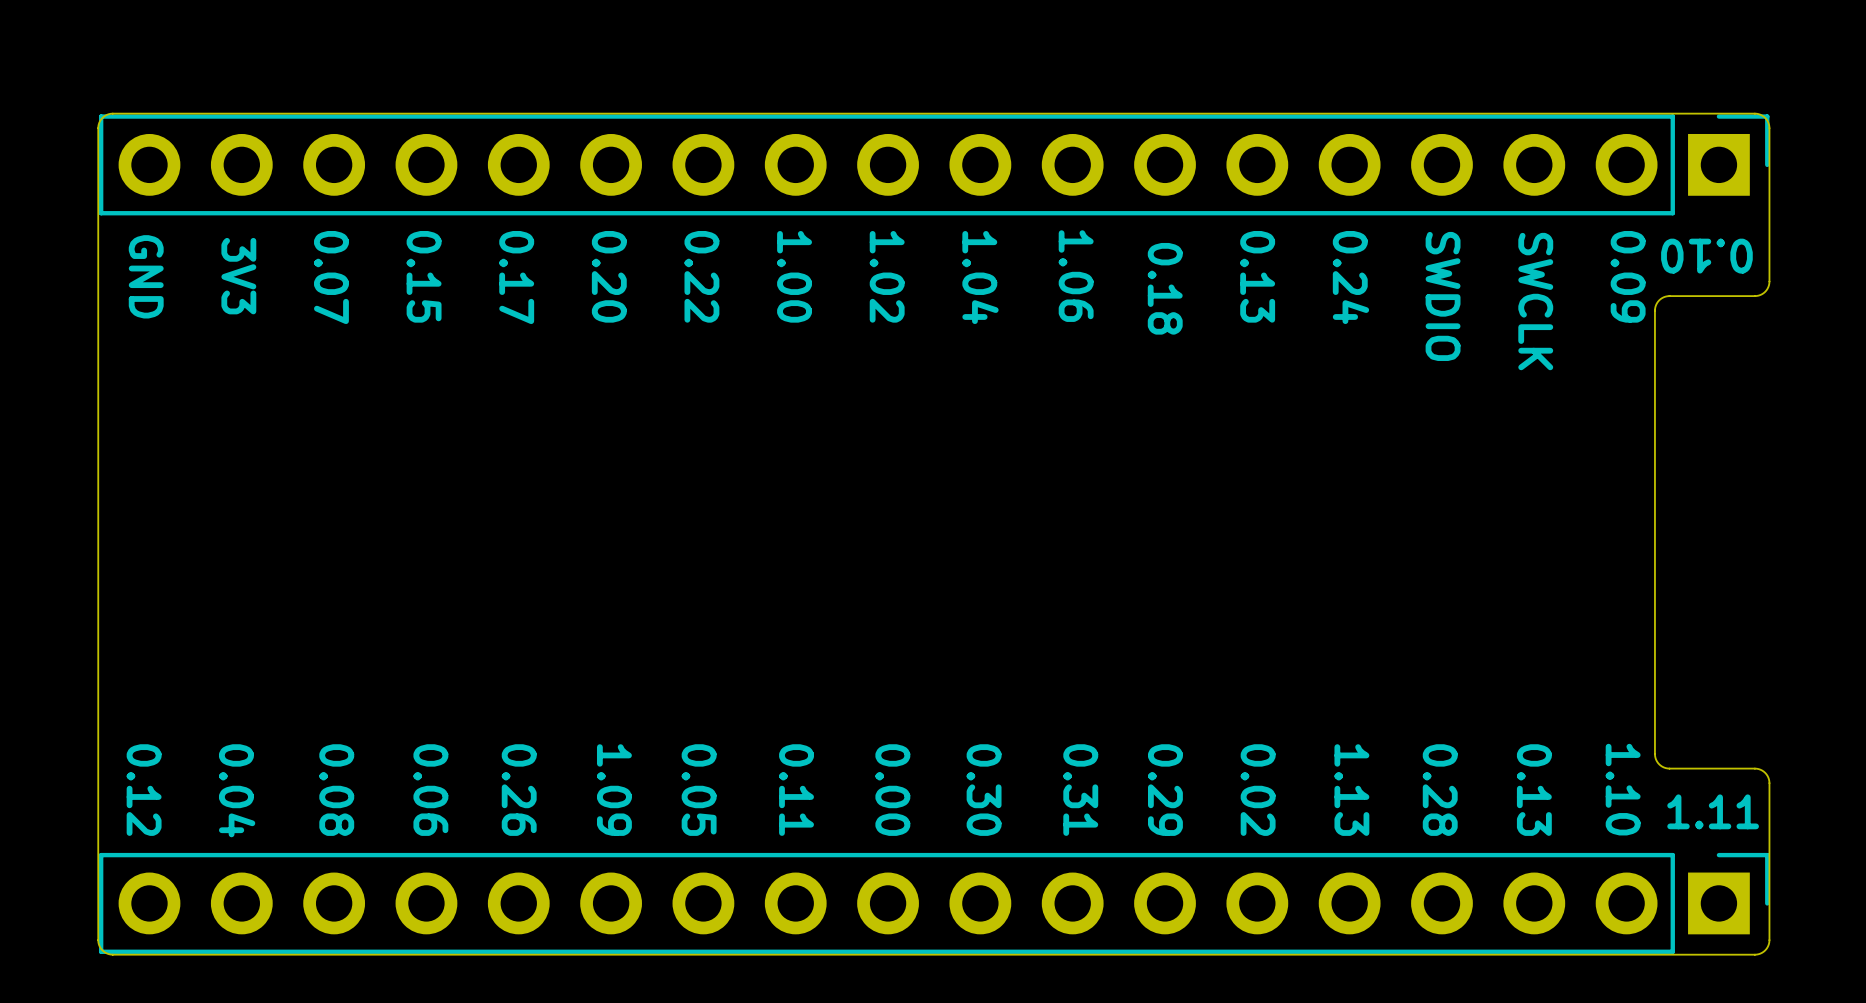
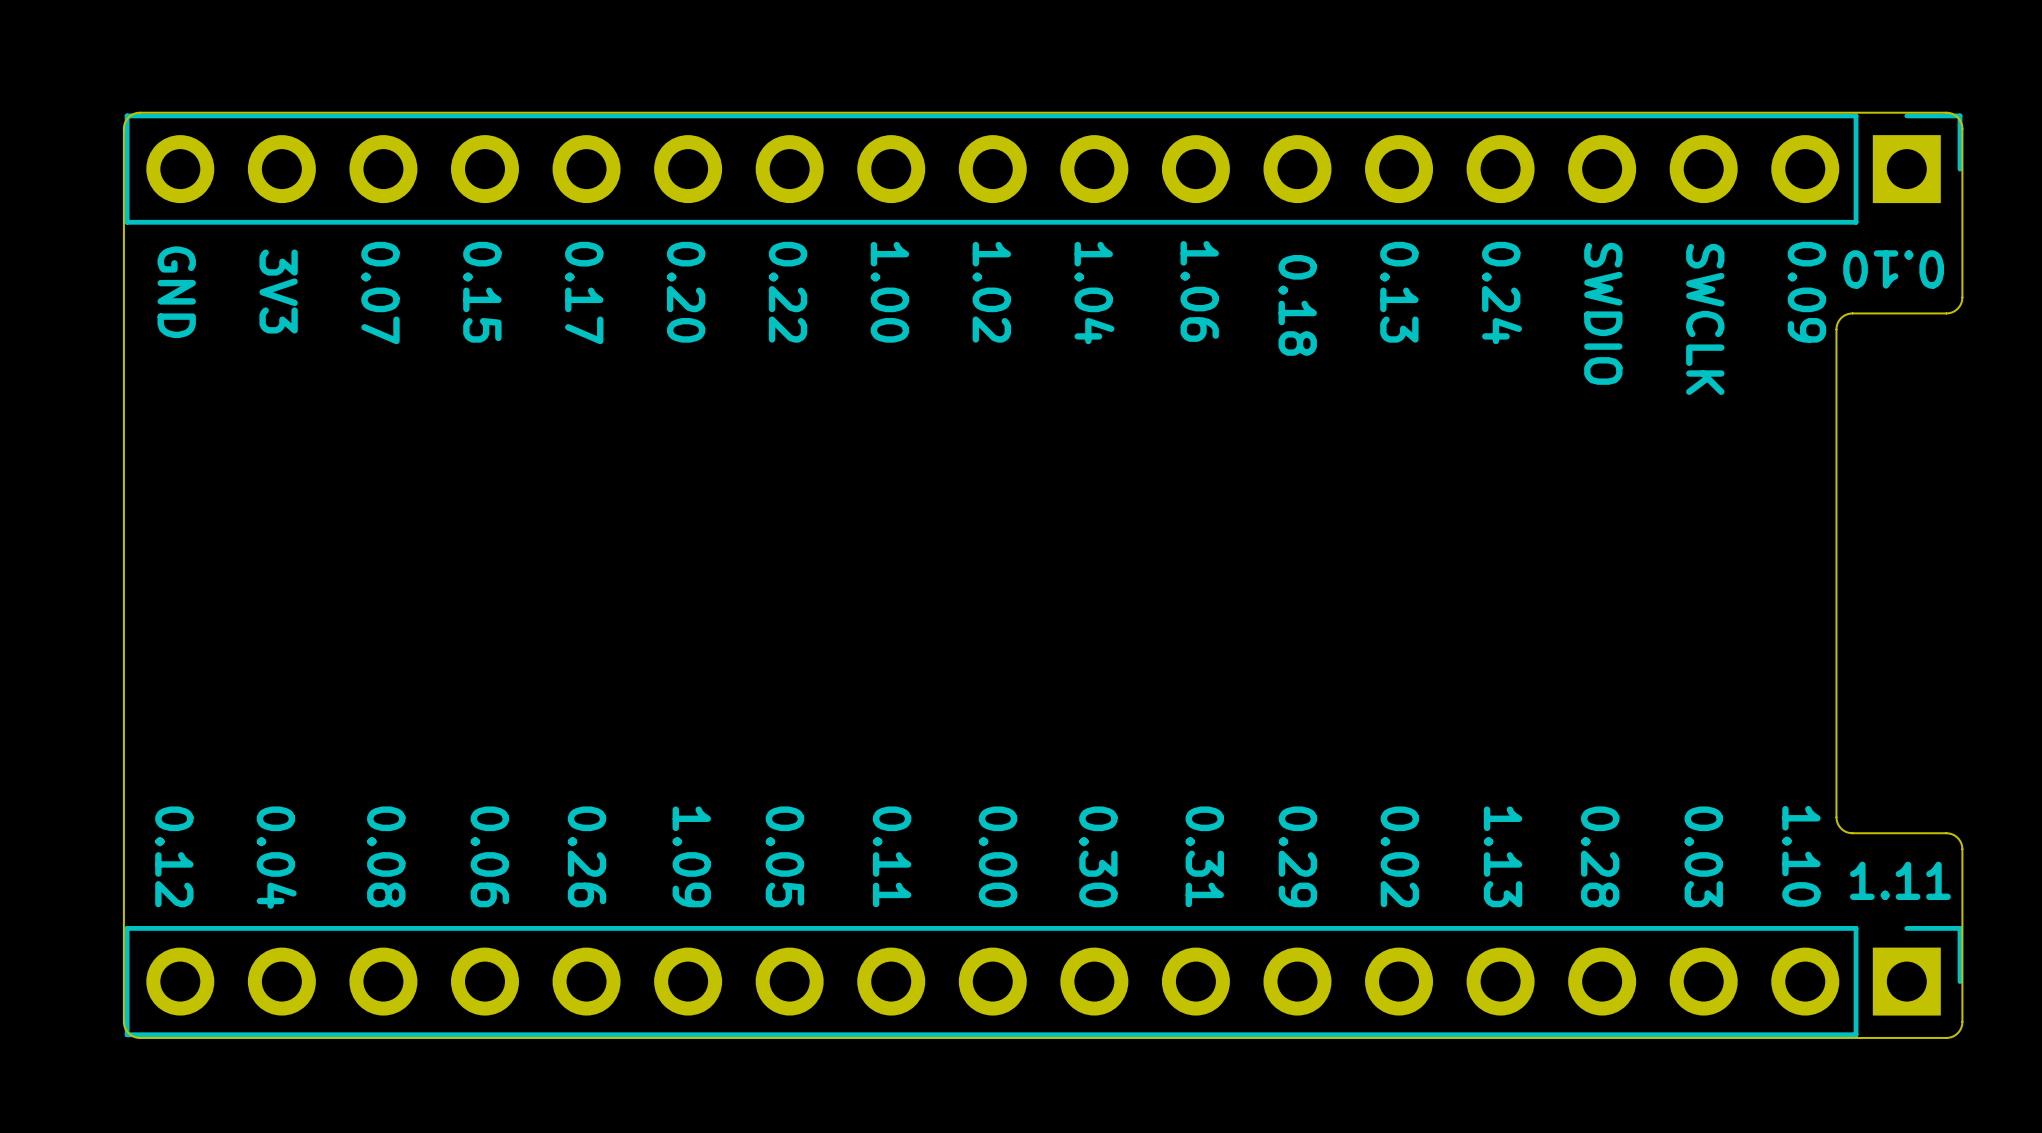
text: 0.13 (1534, 790) -> 0.03 (1703, 856)

